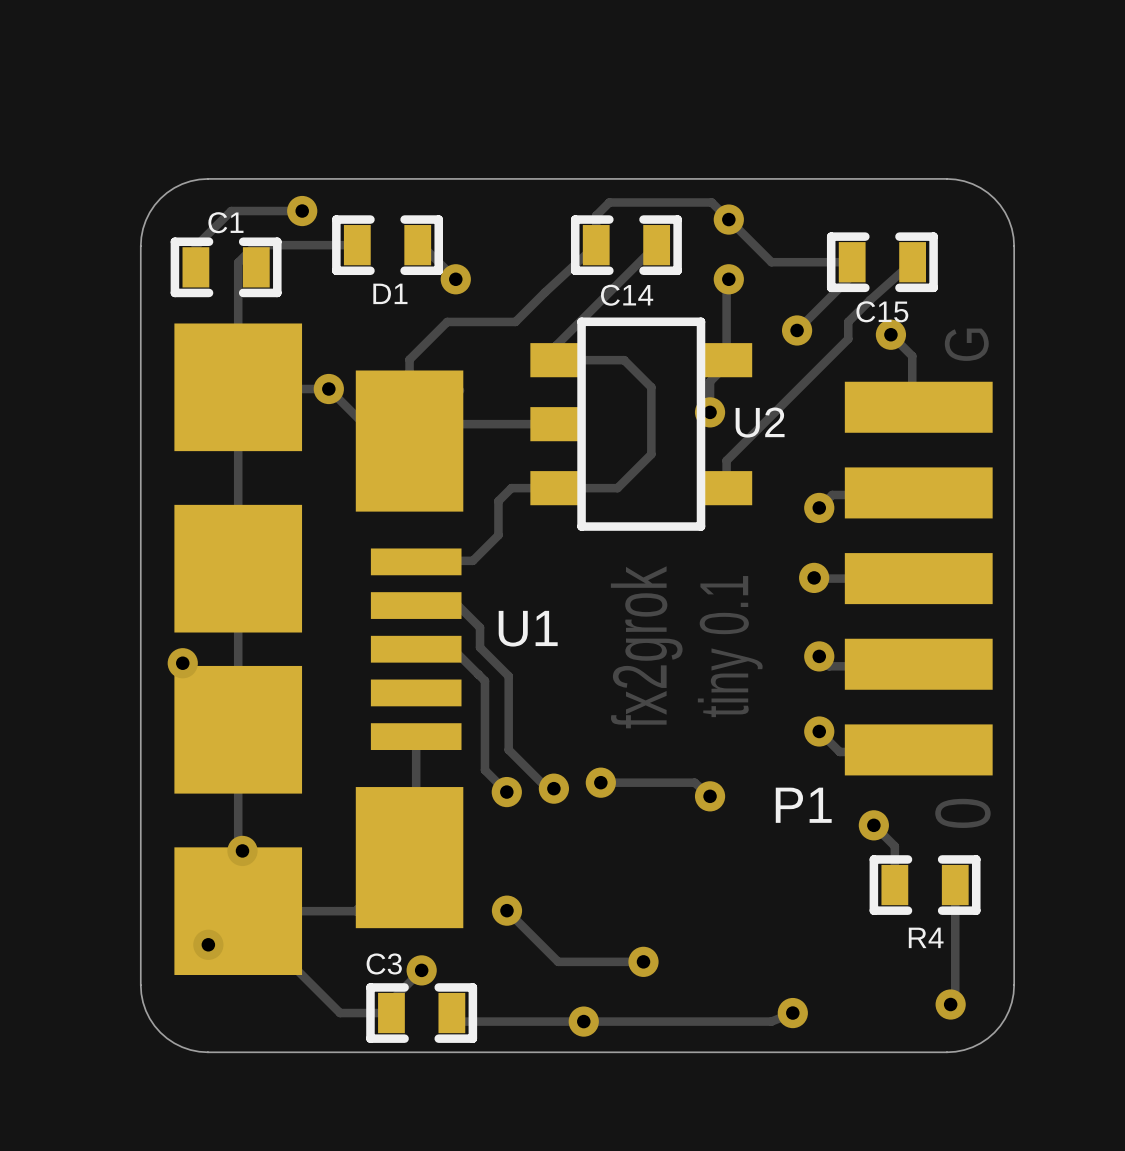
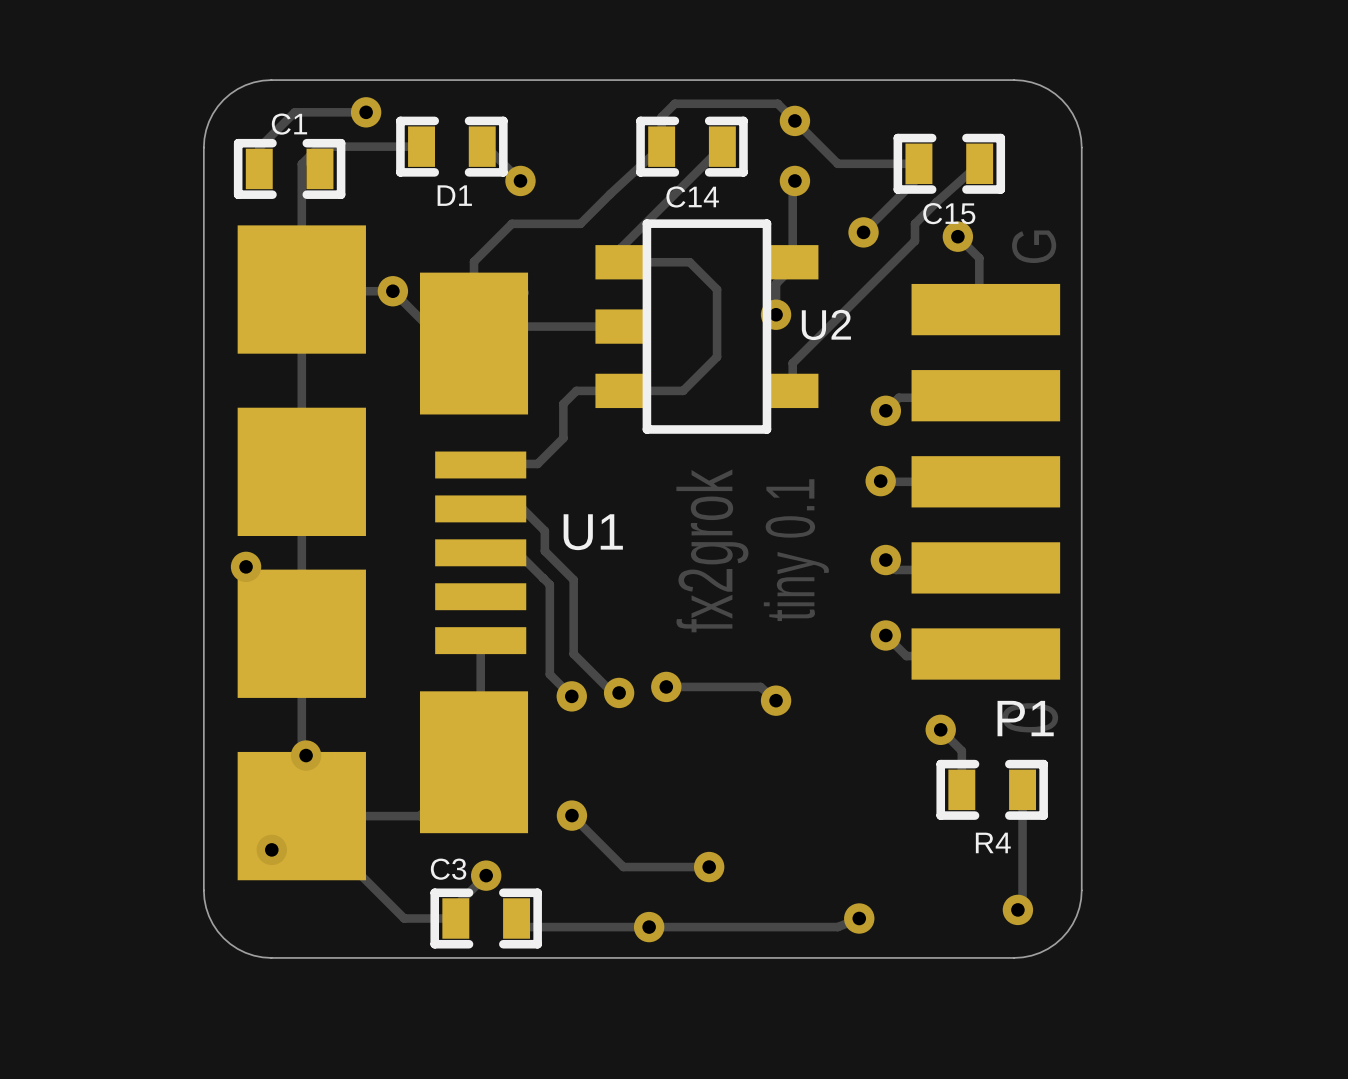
P1 name position: P1 (803, 805) -> P1 (1025, 718)

